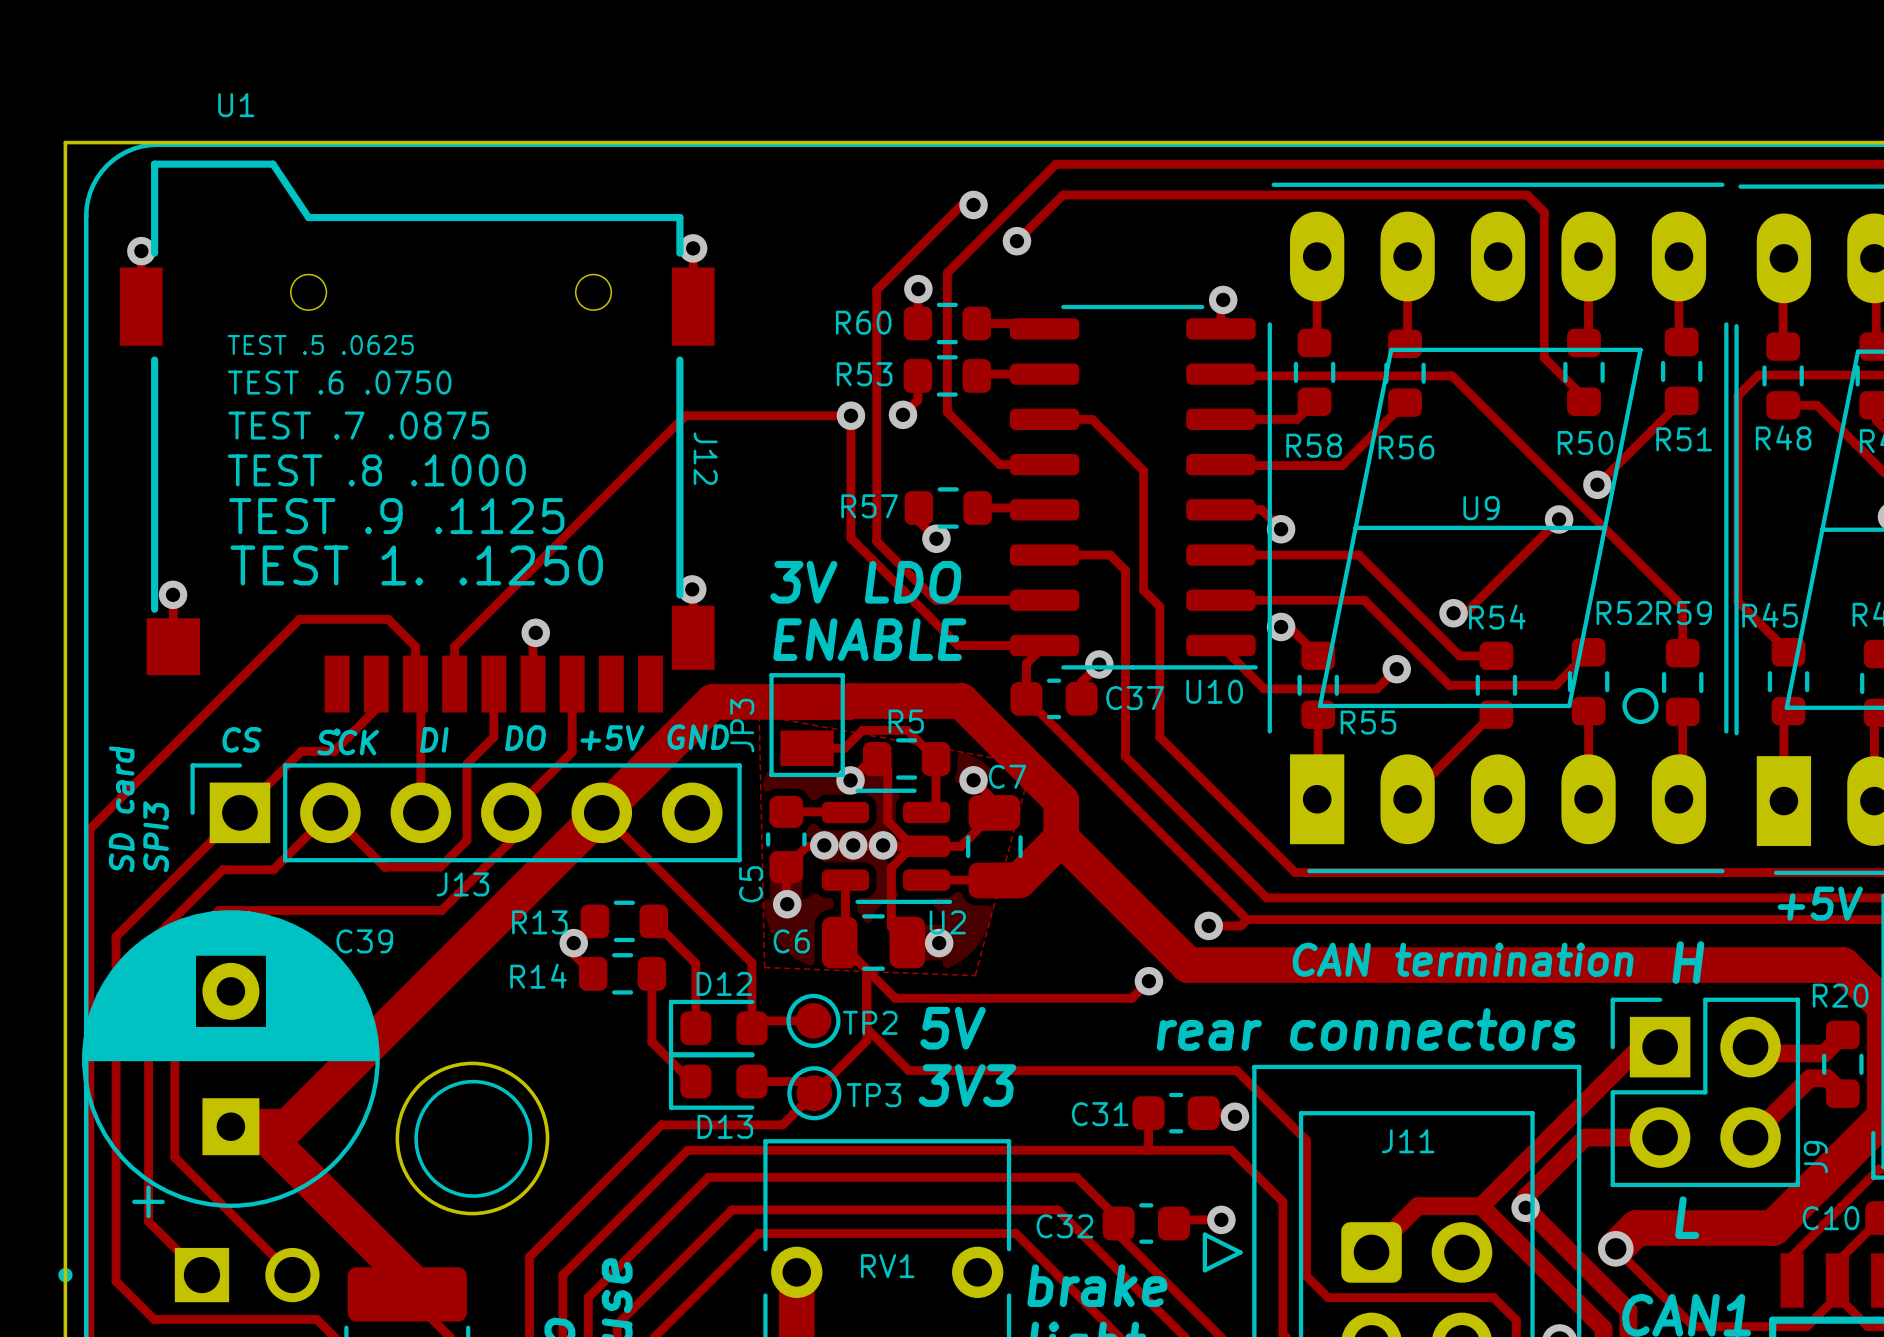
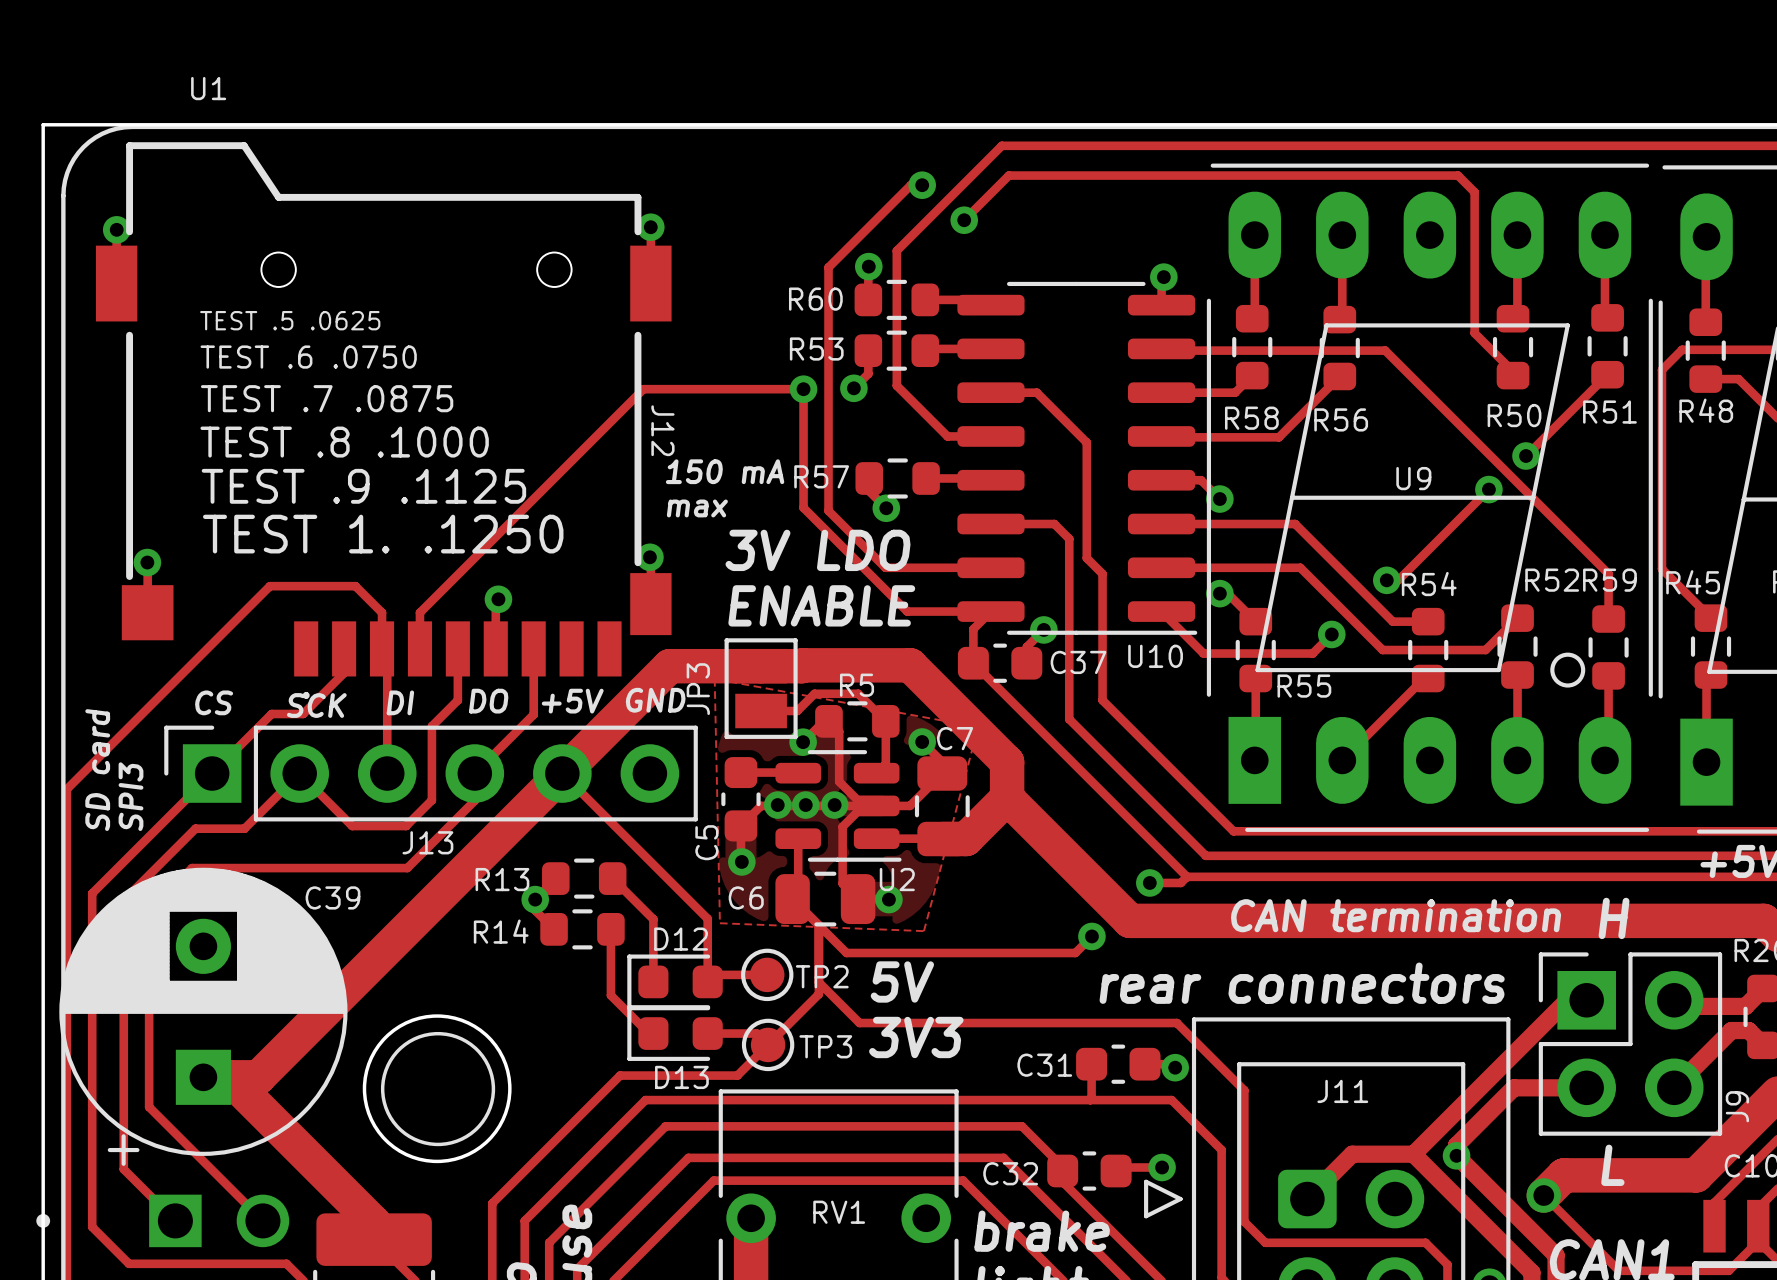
text: none -> 150 mA (725, 471)
text: none -> max (697, 508)

